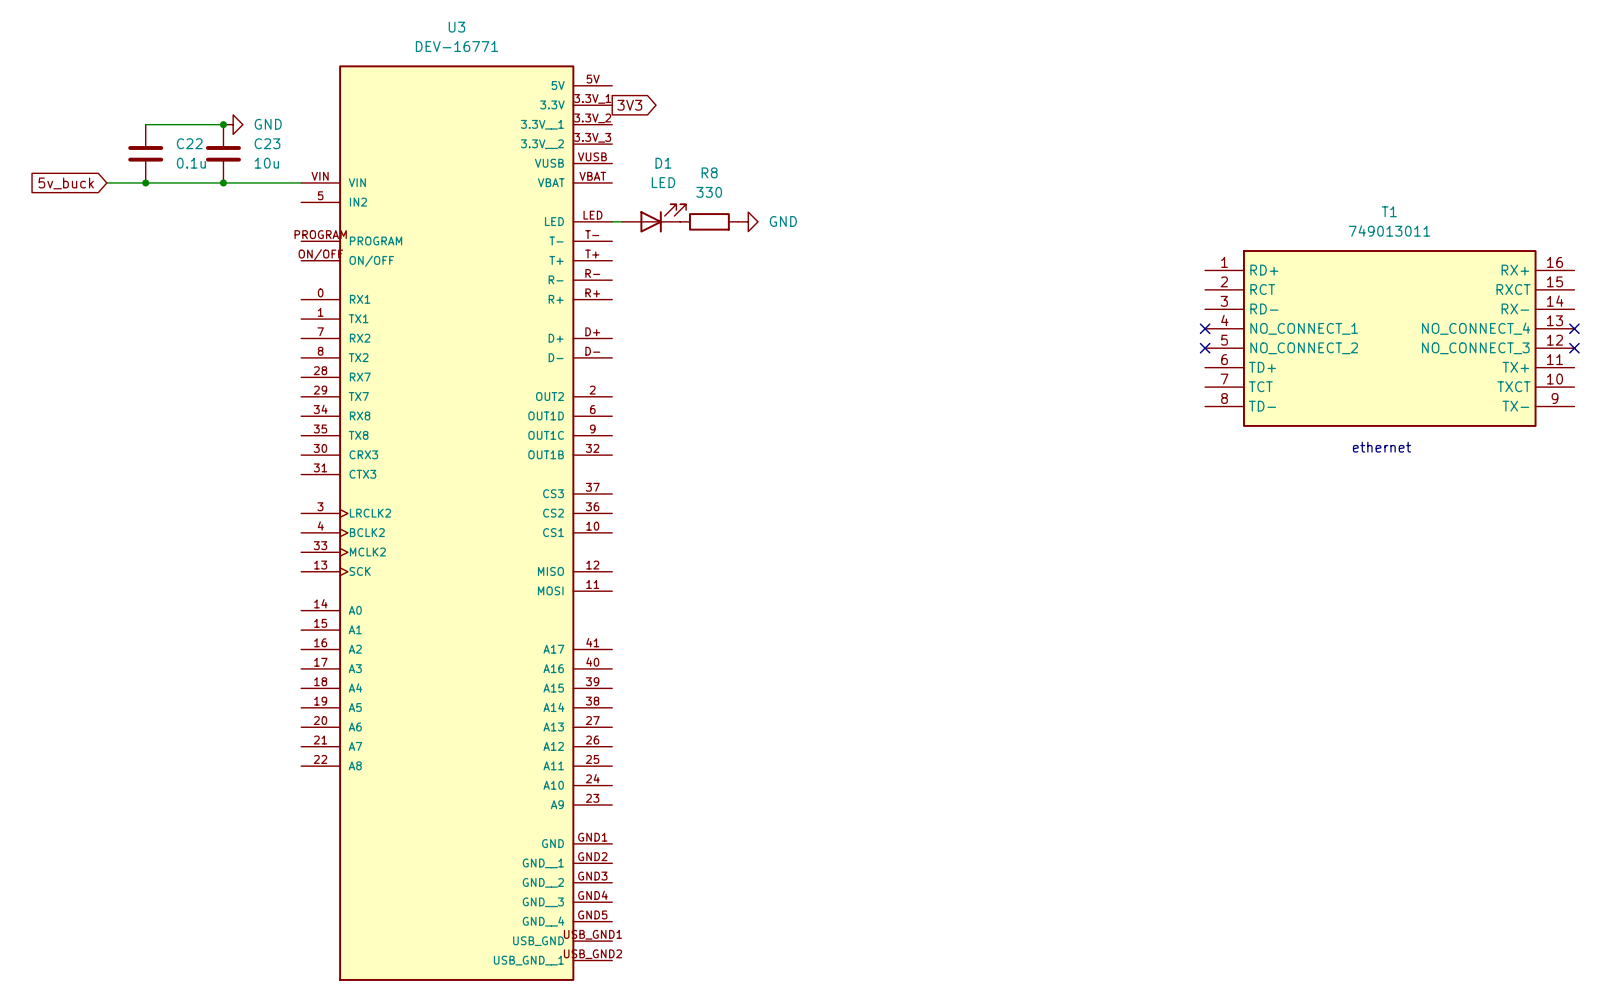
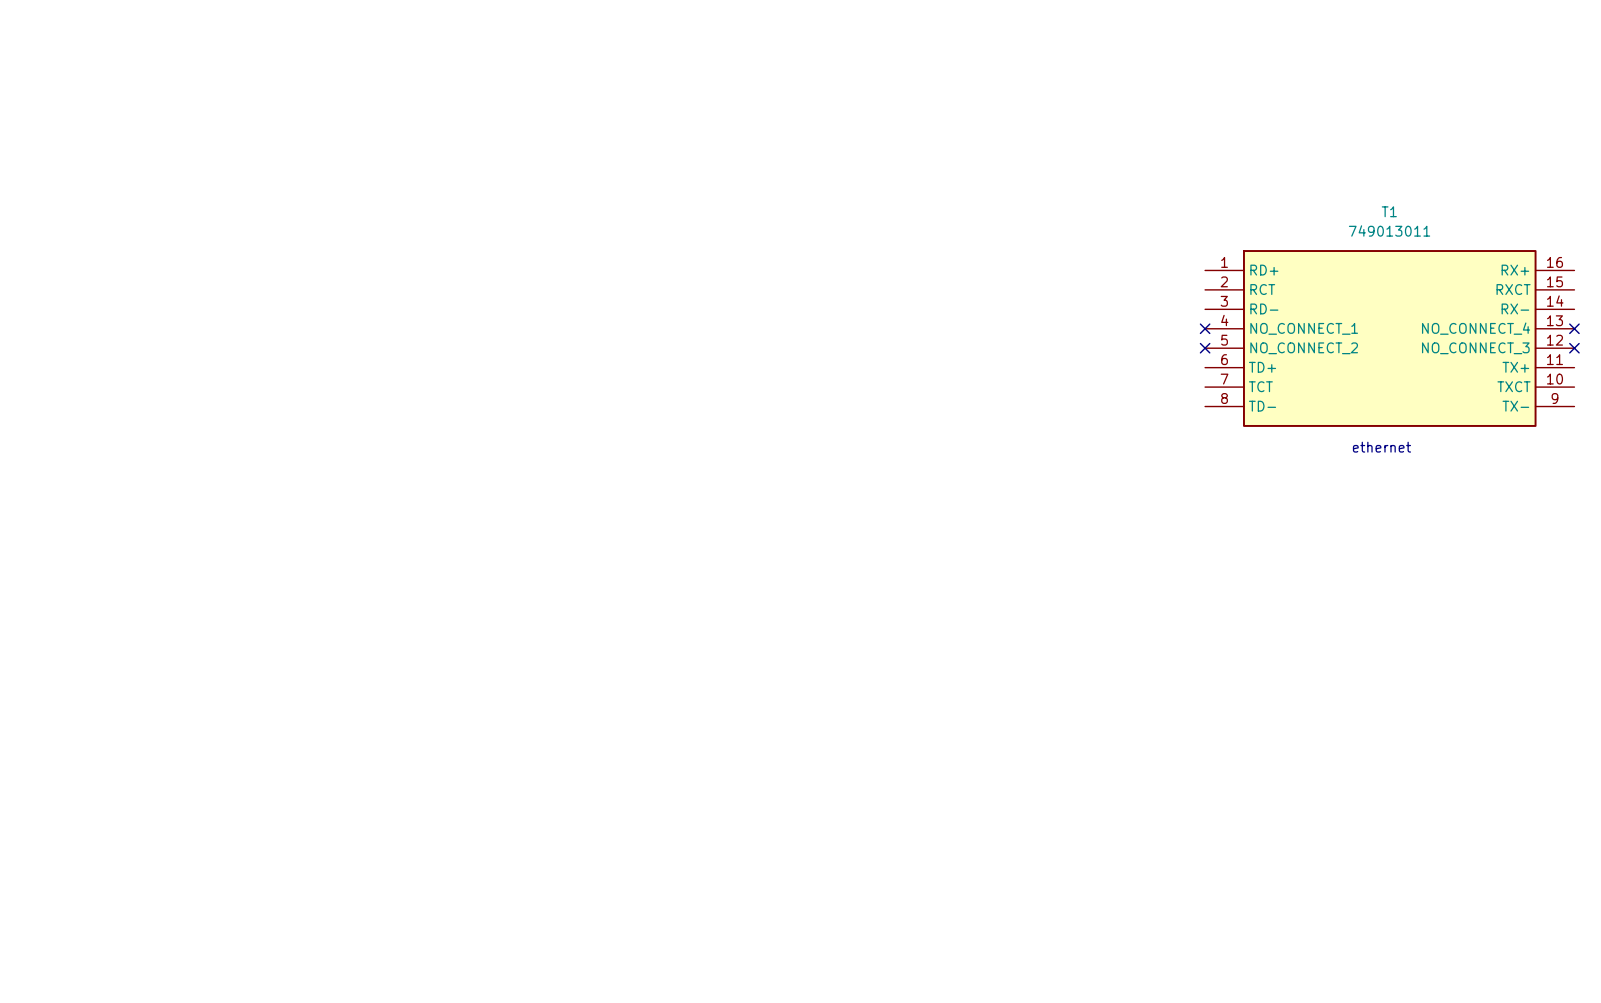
global label: 3V3 (629, 105) -> none
wire: (145, 124) (223, 124) -> none
junction: (223, 124) -> none
power symbol: GND (233, 124) -> none
C22: 0.1u (145, 153) -> none
C23: 10u (223, 153) -> none
wire: (106, 182) (301, 182) -> none
junction: (145, 182) -> none
junction: (223, 182) -> none
global label: 5v_buck (66, 183) -> none
D1: LED (654, 218) -> none
wire: (612, 221) (621, 221) -> none
R8: 330 (709, 221) -> none
power symbol: GND (748, 221) -> none
U3: DEV-16771 (456, 523) -> none

